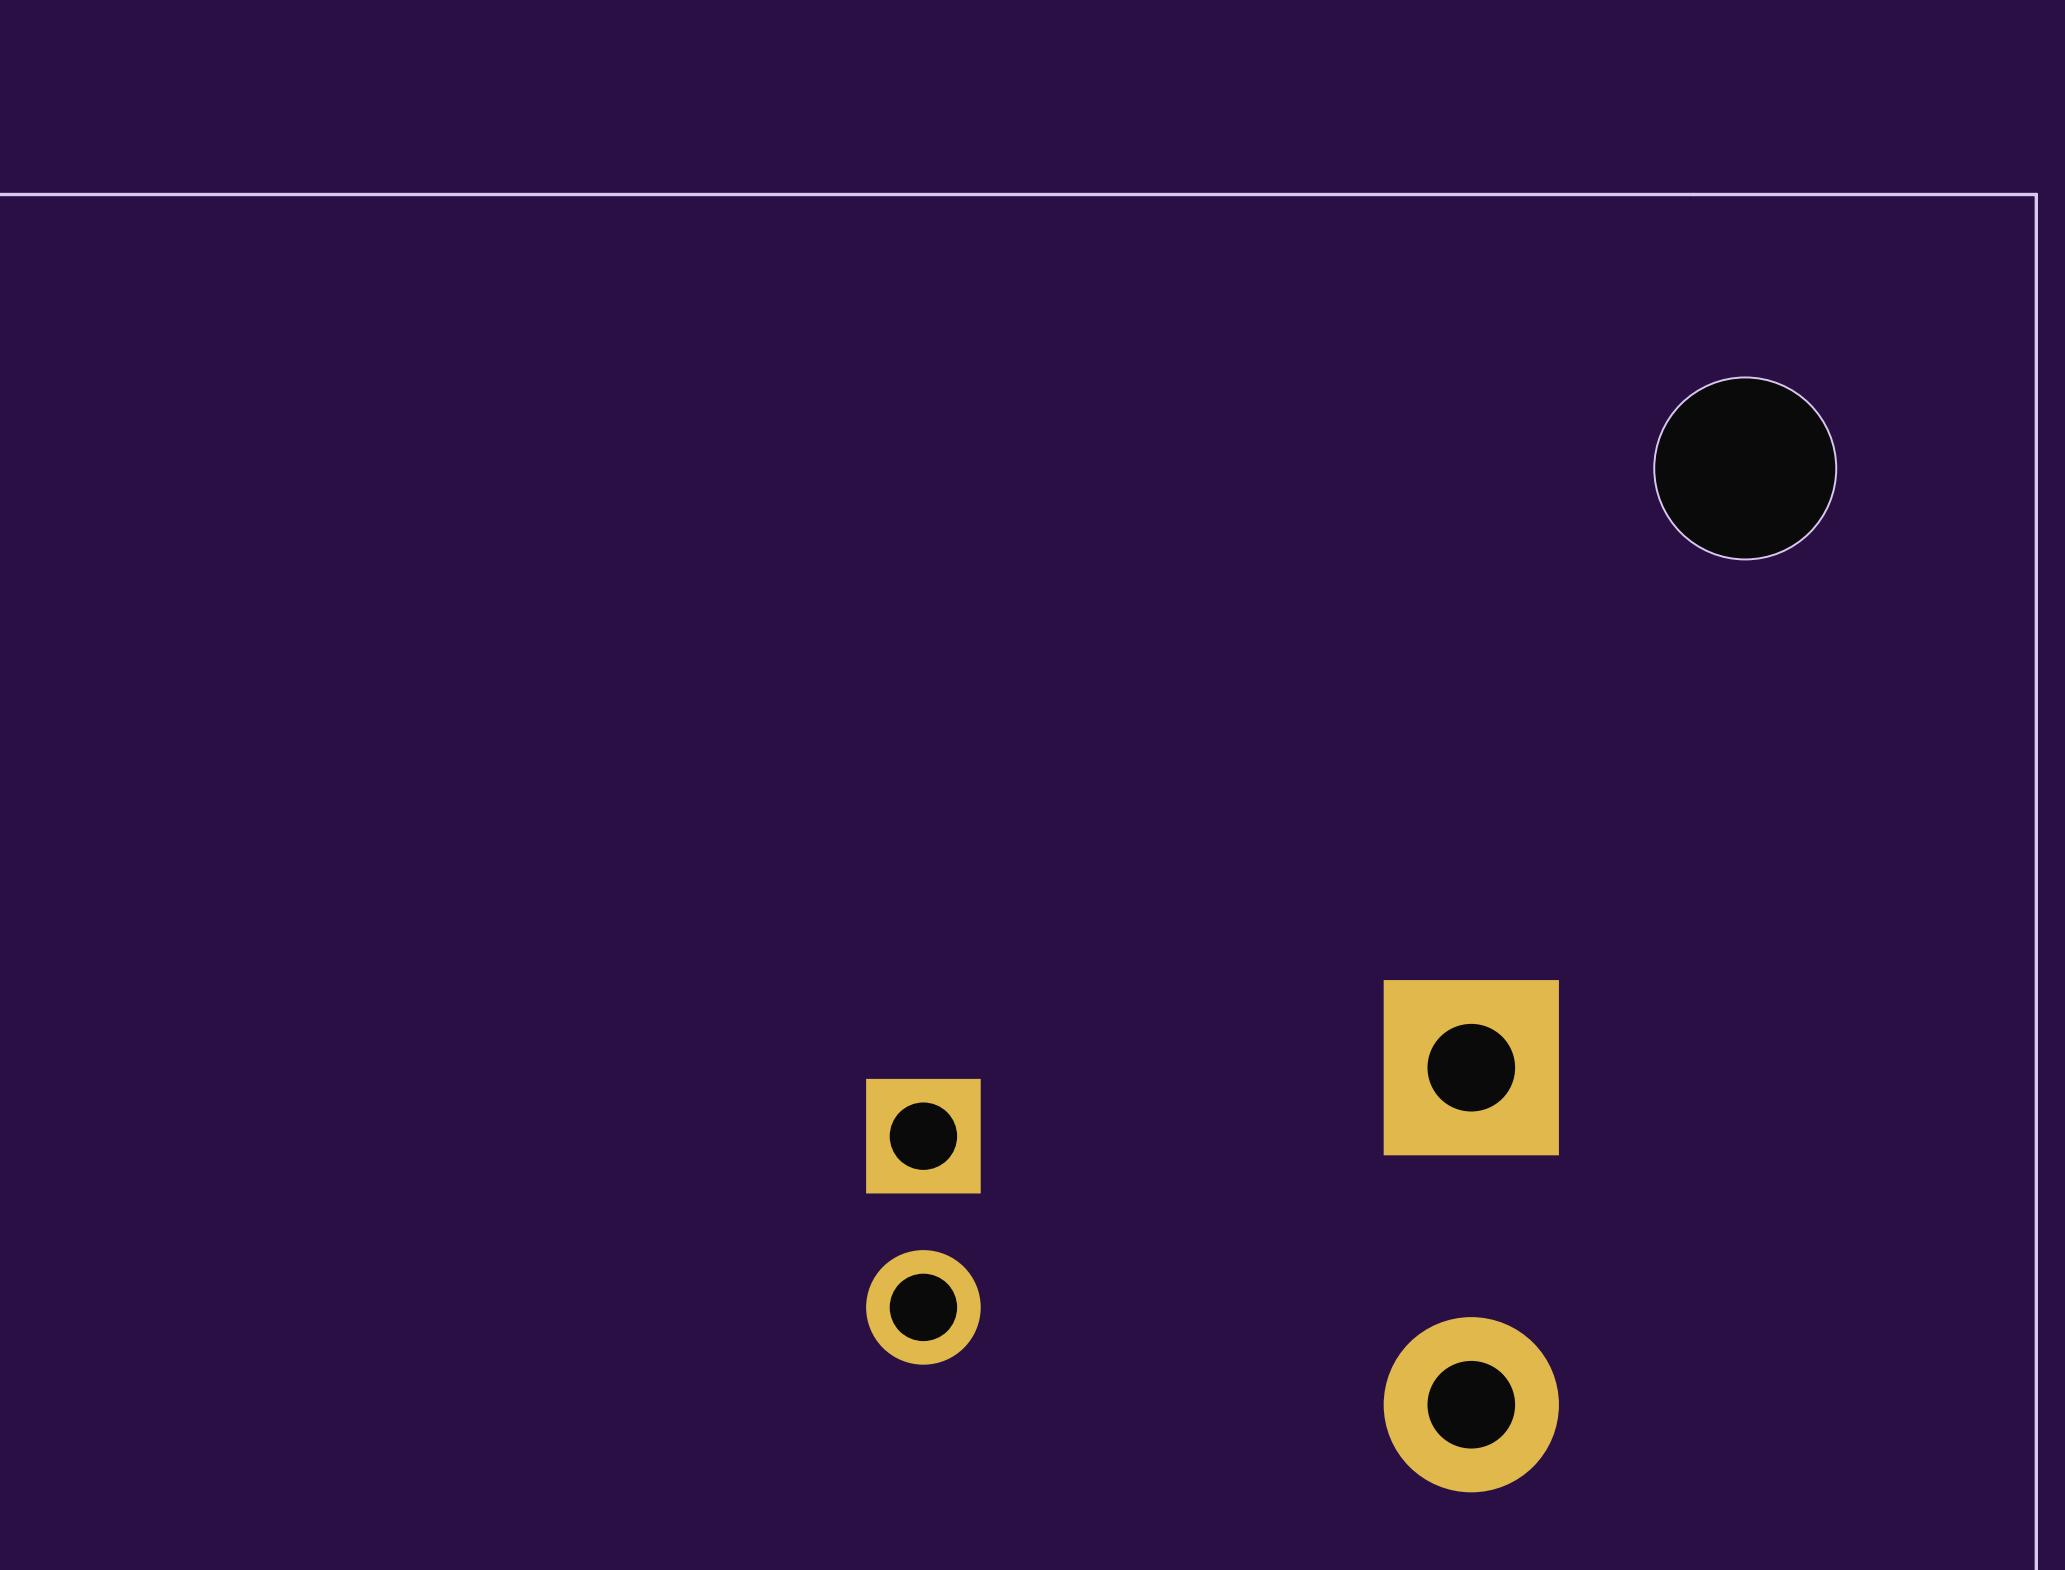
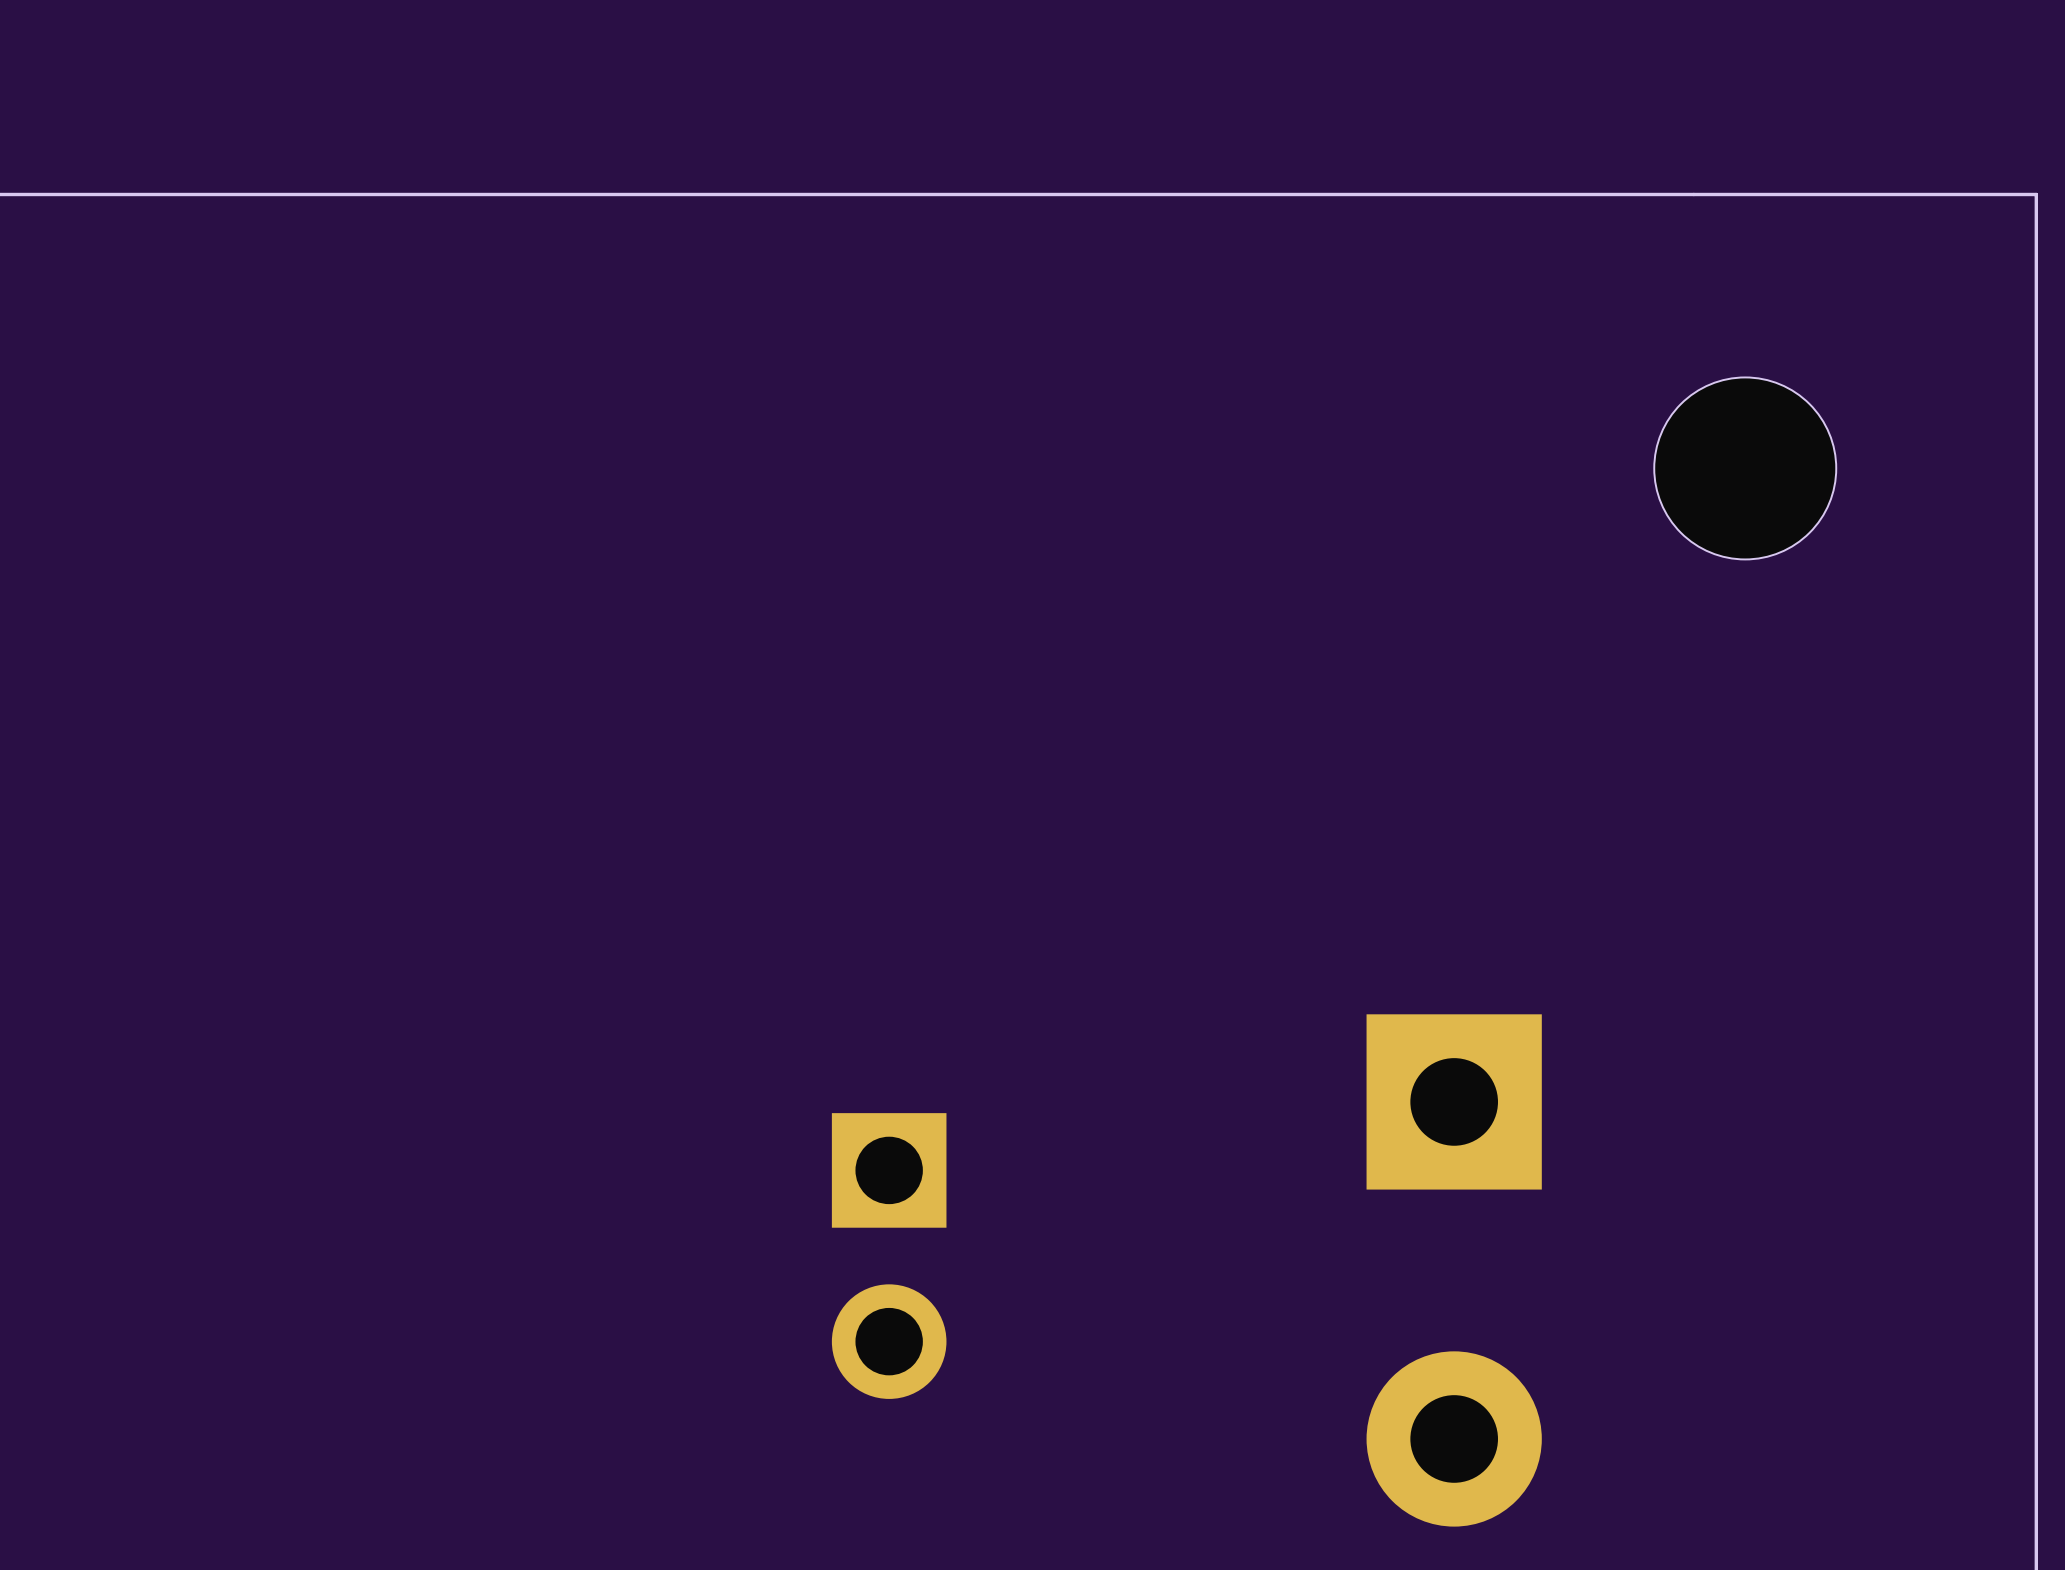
part position: (923, 1221) -> (889, 1256)
part position: (1471, 1236) -> (1454, 1270)

